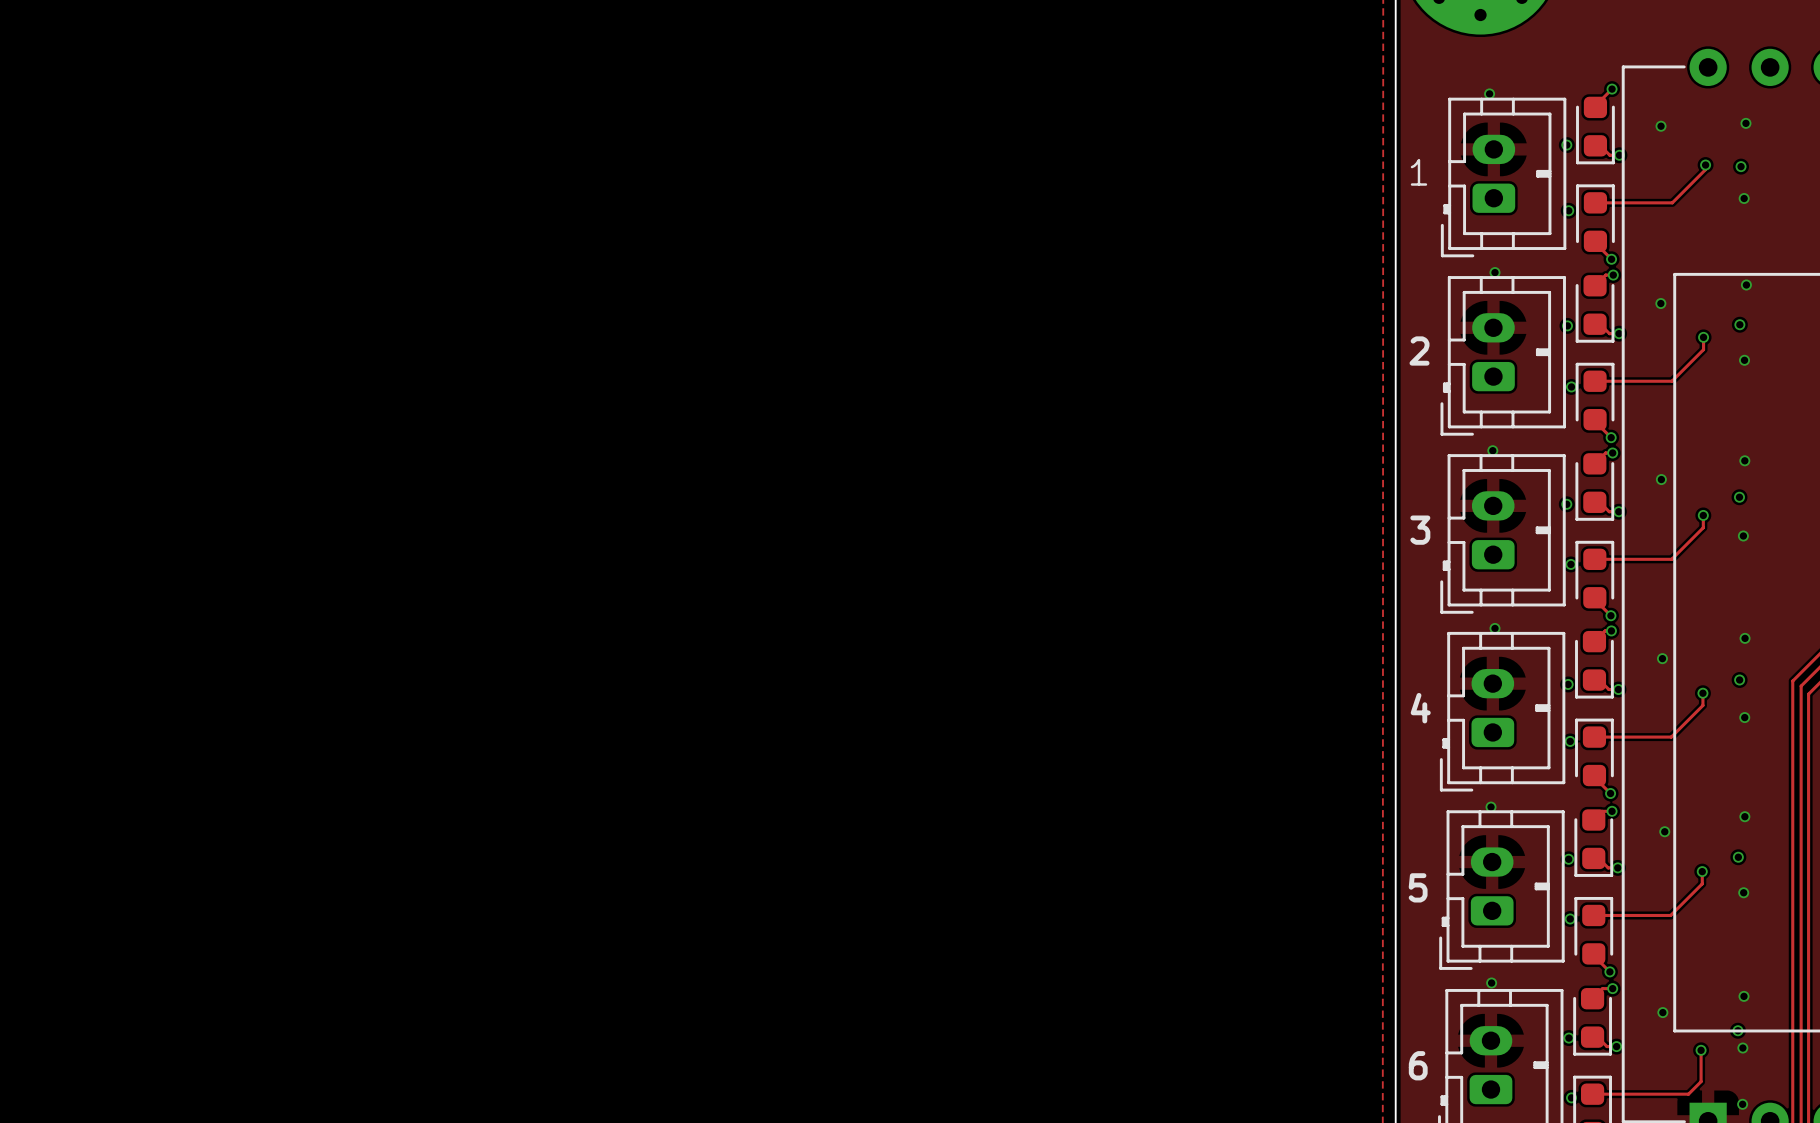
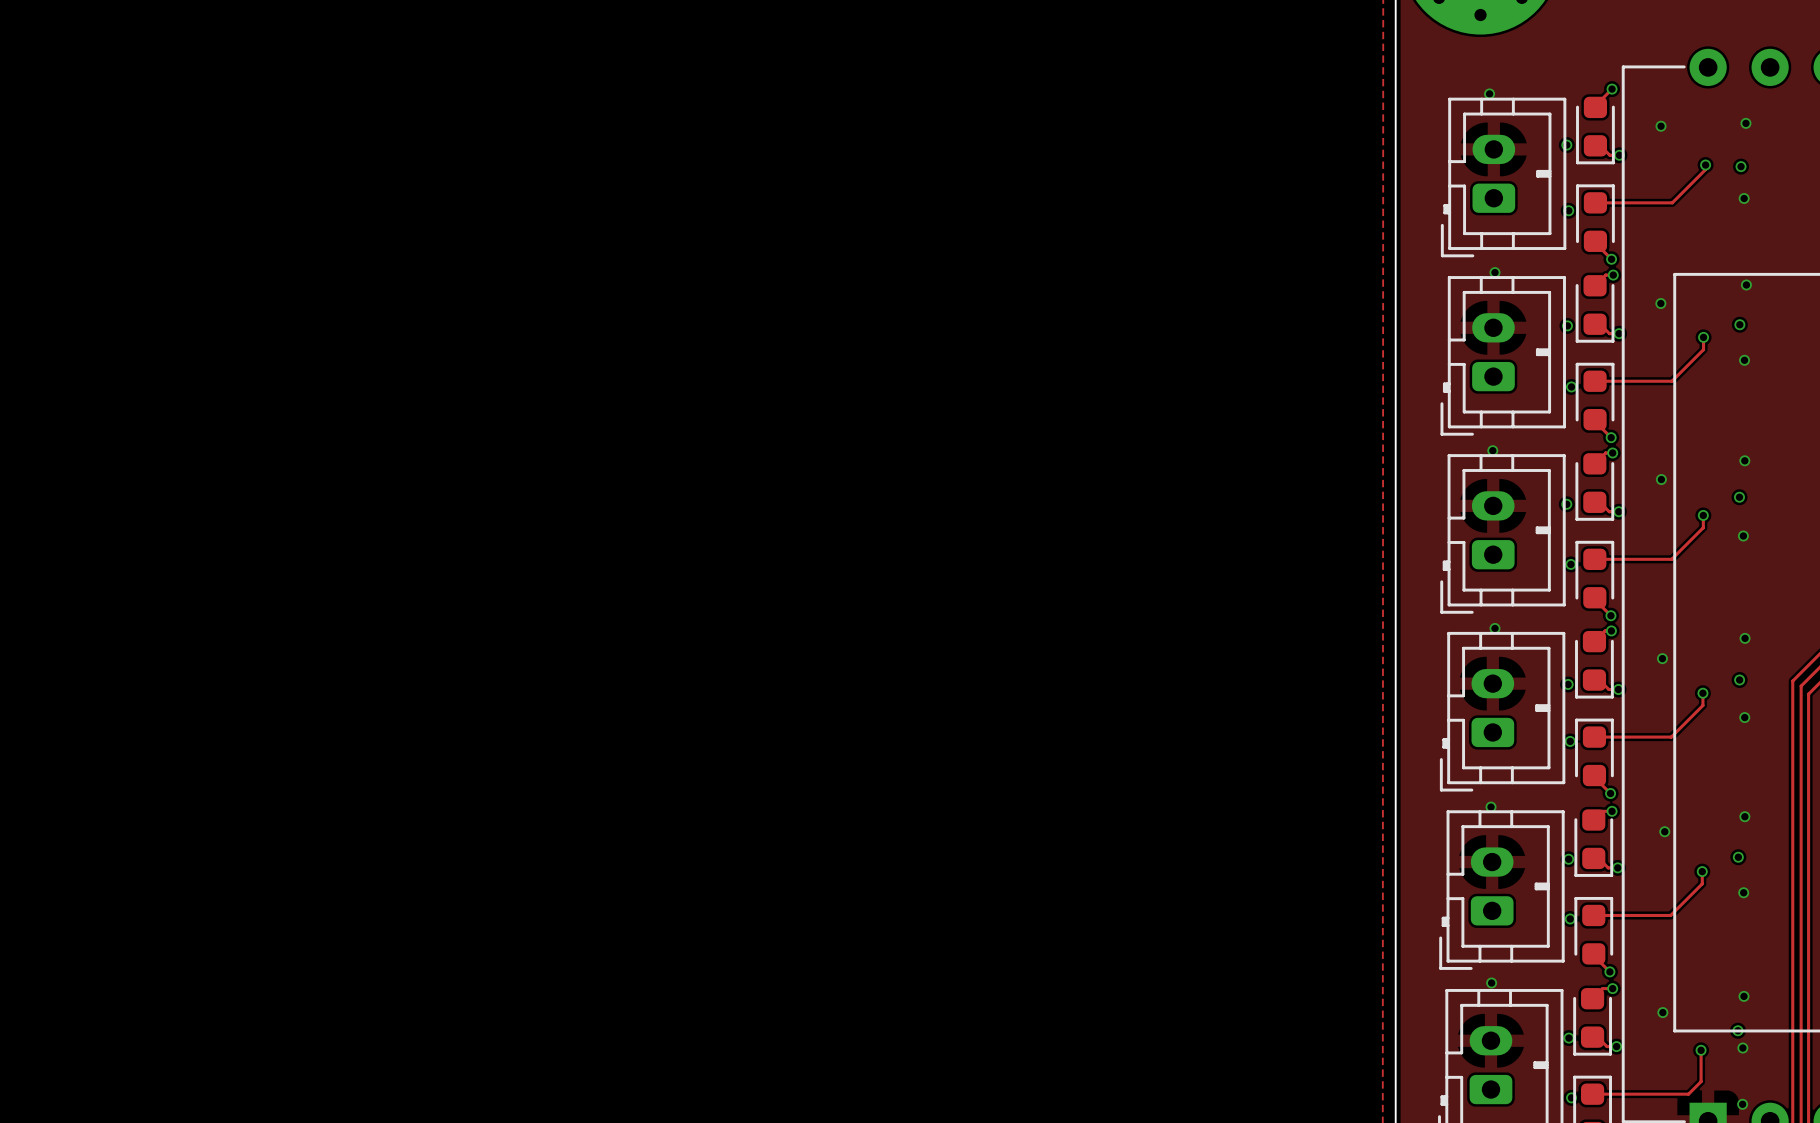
text: 1 (1418, 172) -> none
text: 2 (1419, 350) -> none
text: 3 (1420, 530) -> none
text: 4 (1420, 708) -> none
text: 5 (1418, 887) -> none
text: 6 (1418, 1065) -> none

